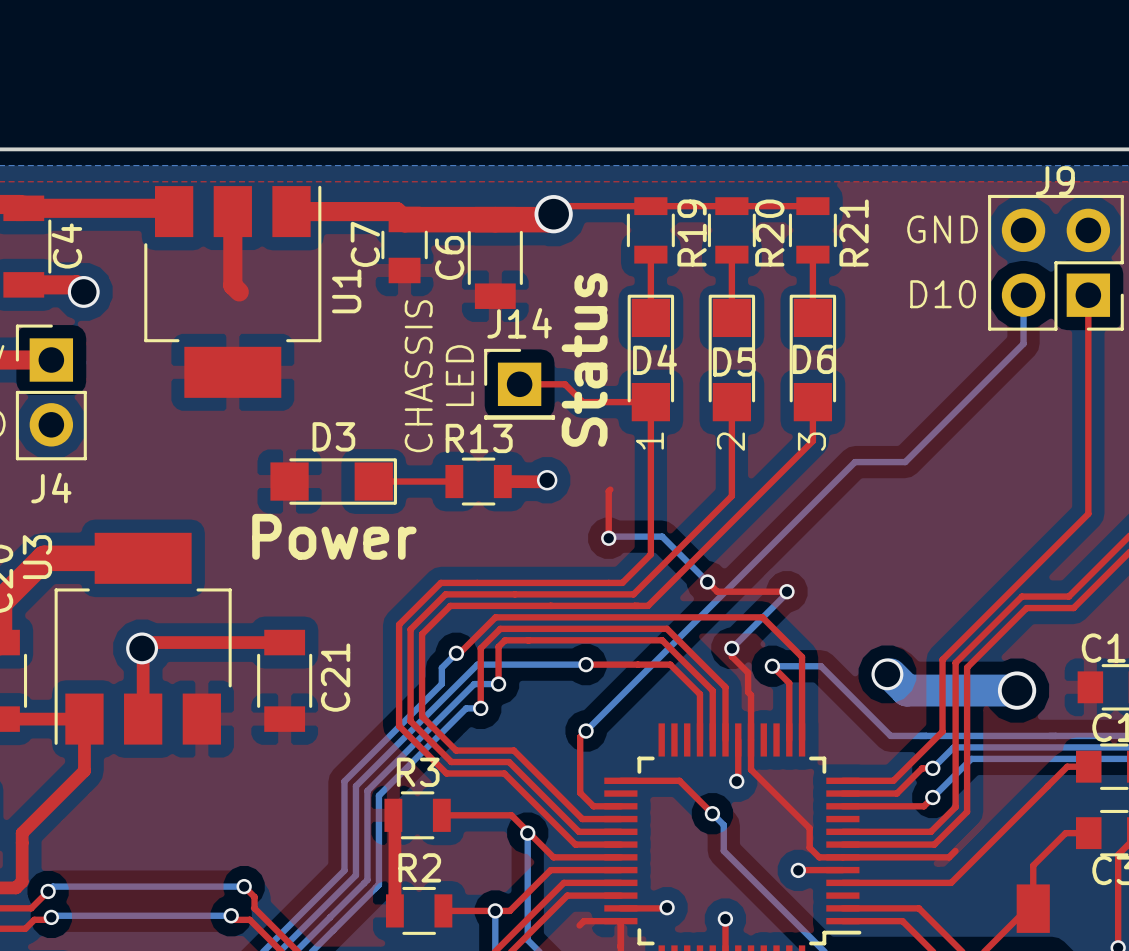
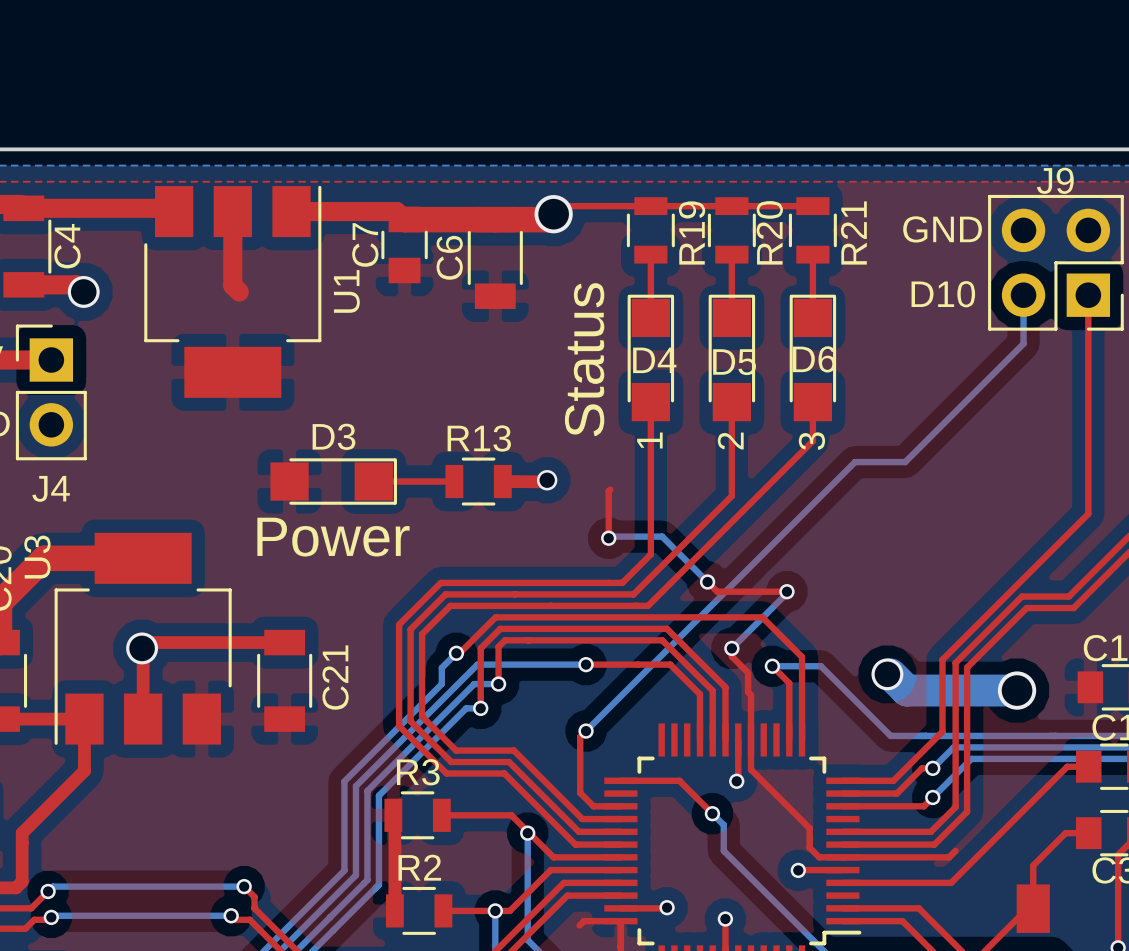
text: LED (459, 375) -> none
text: CHASSIS (418, 376) -> none
top track: (519, 384) (564, 384) (582, 402) (650, 402) -> none
J14: (519, 384) -> none

